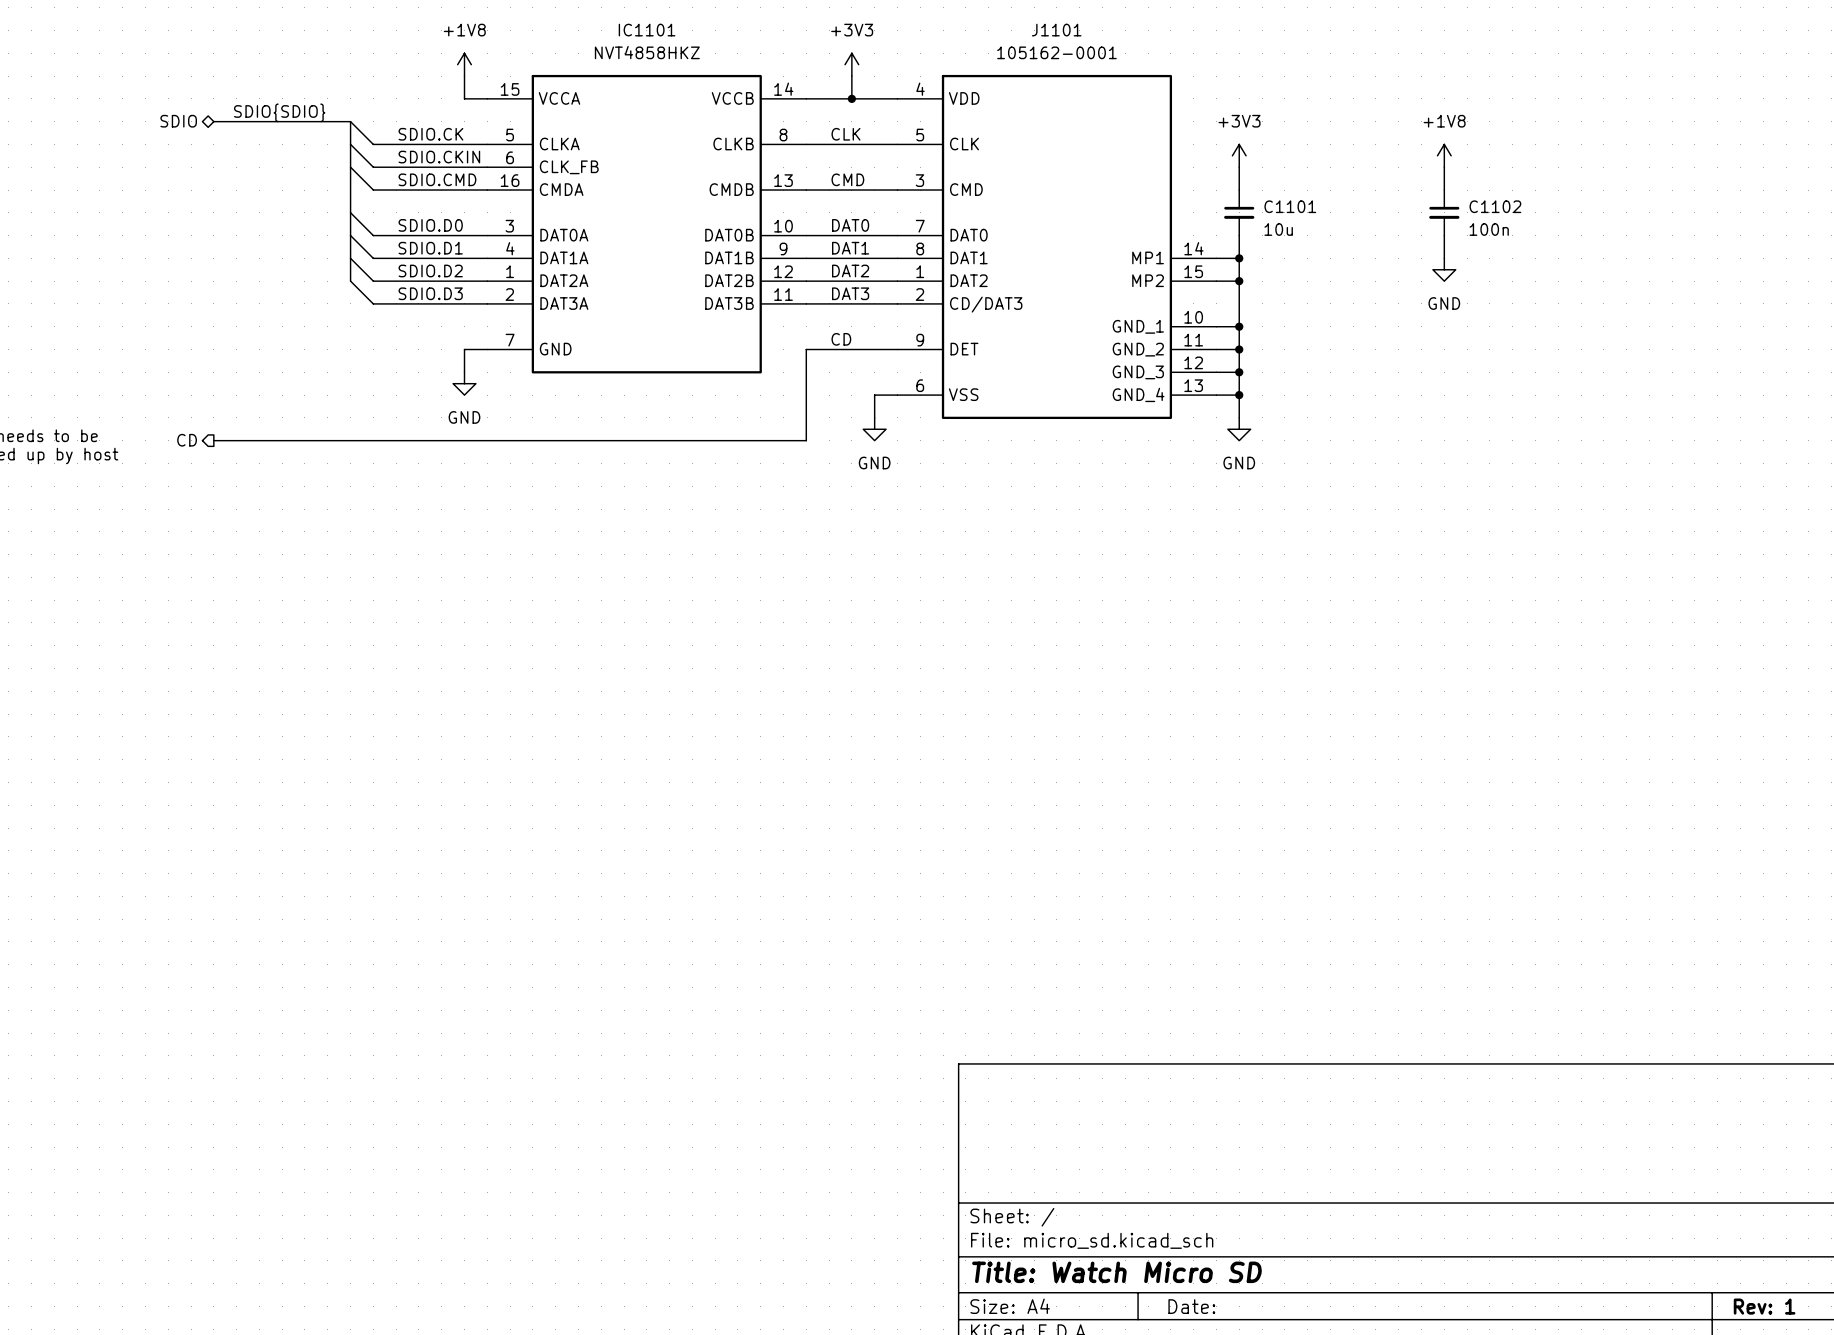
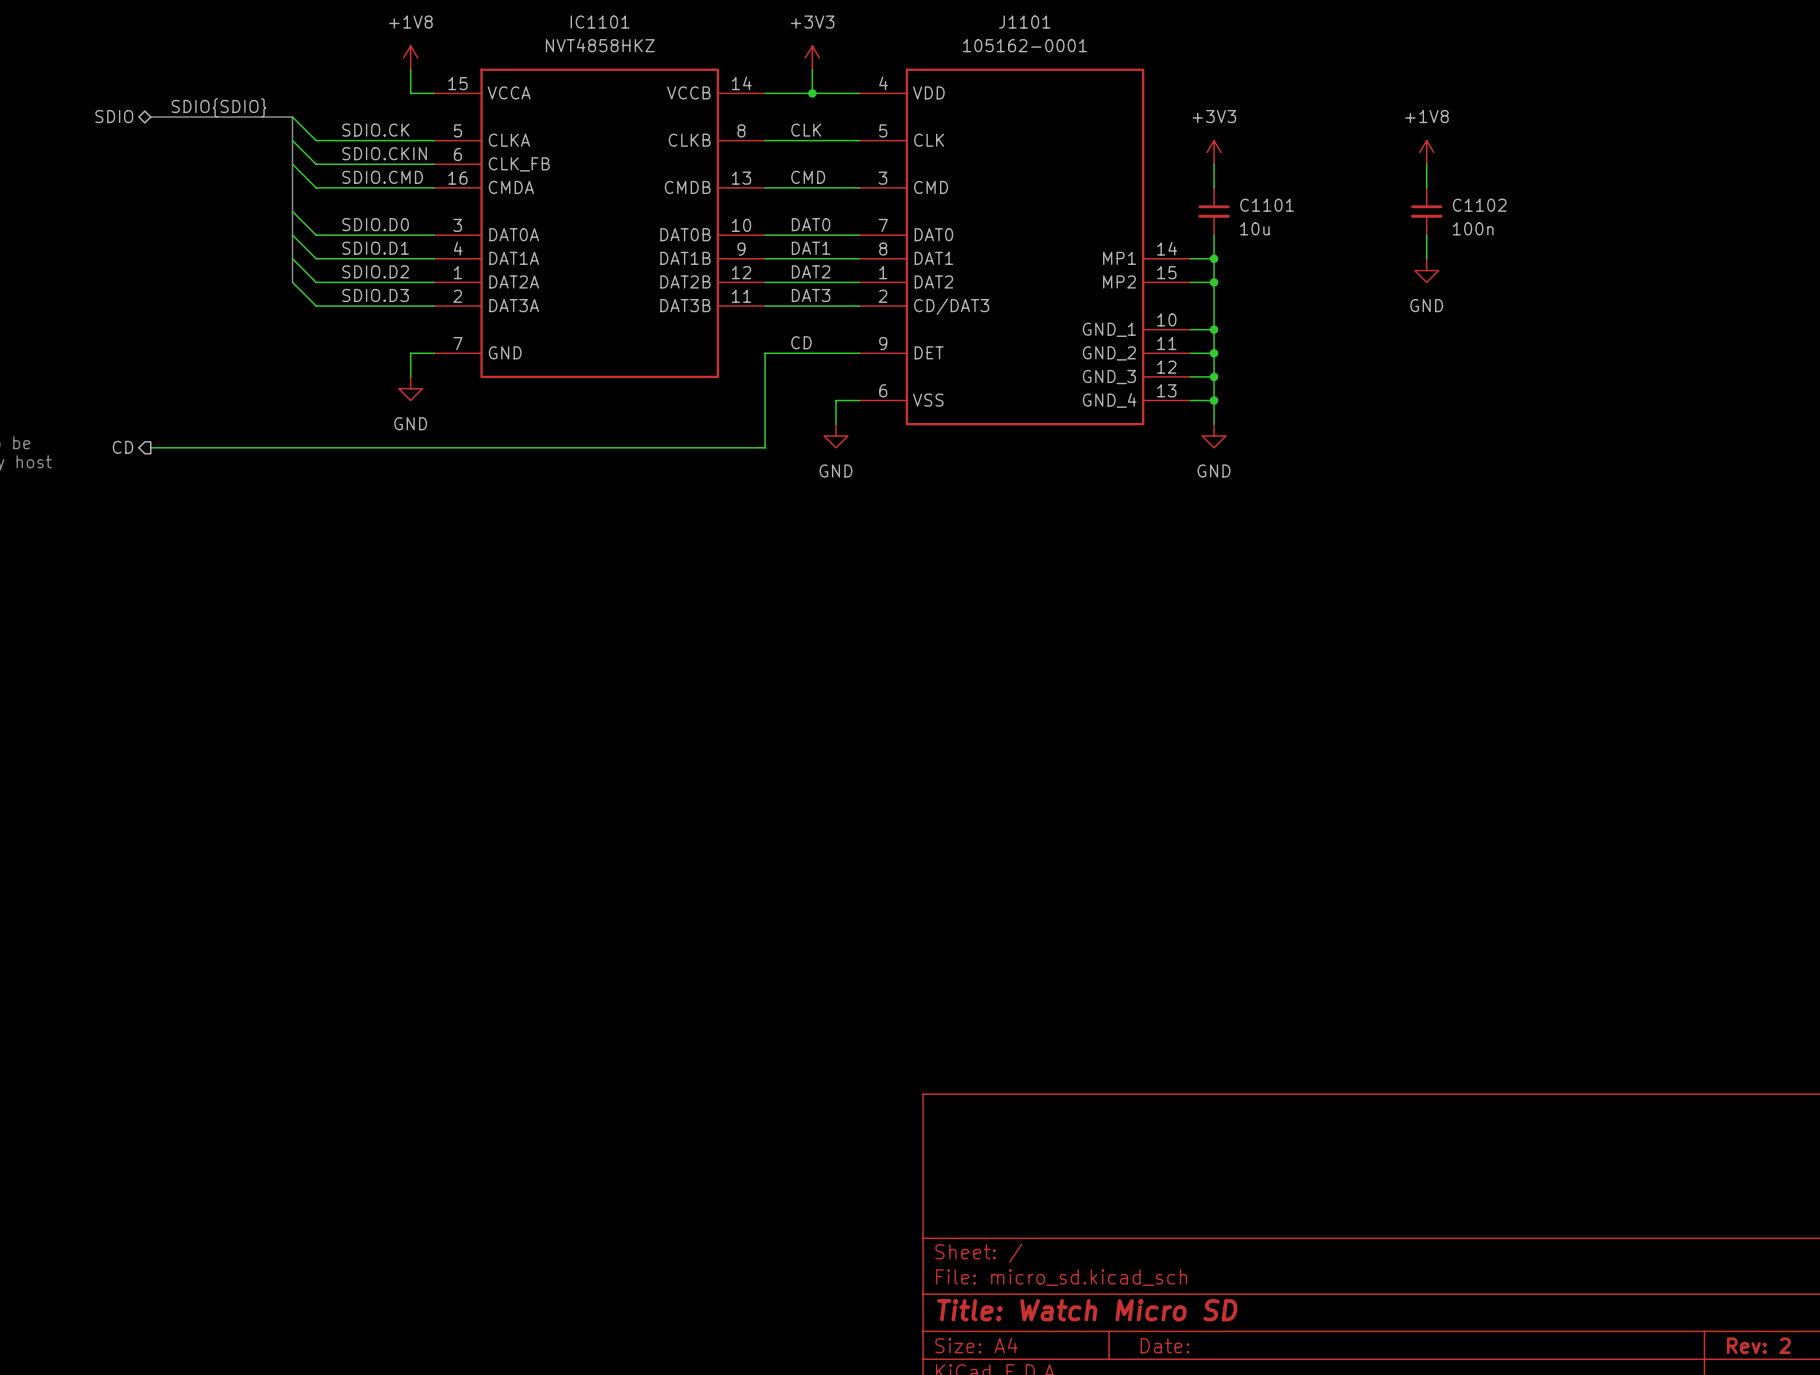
title block: Rev: 1 (1764, 1306) -> Rev: 2 (1758, 1345)

